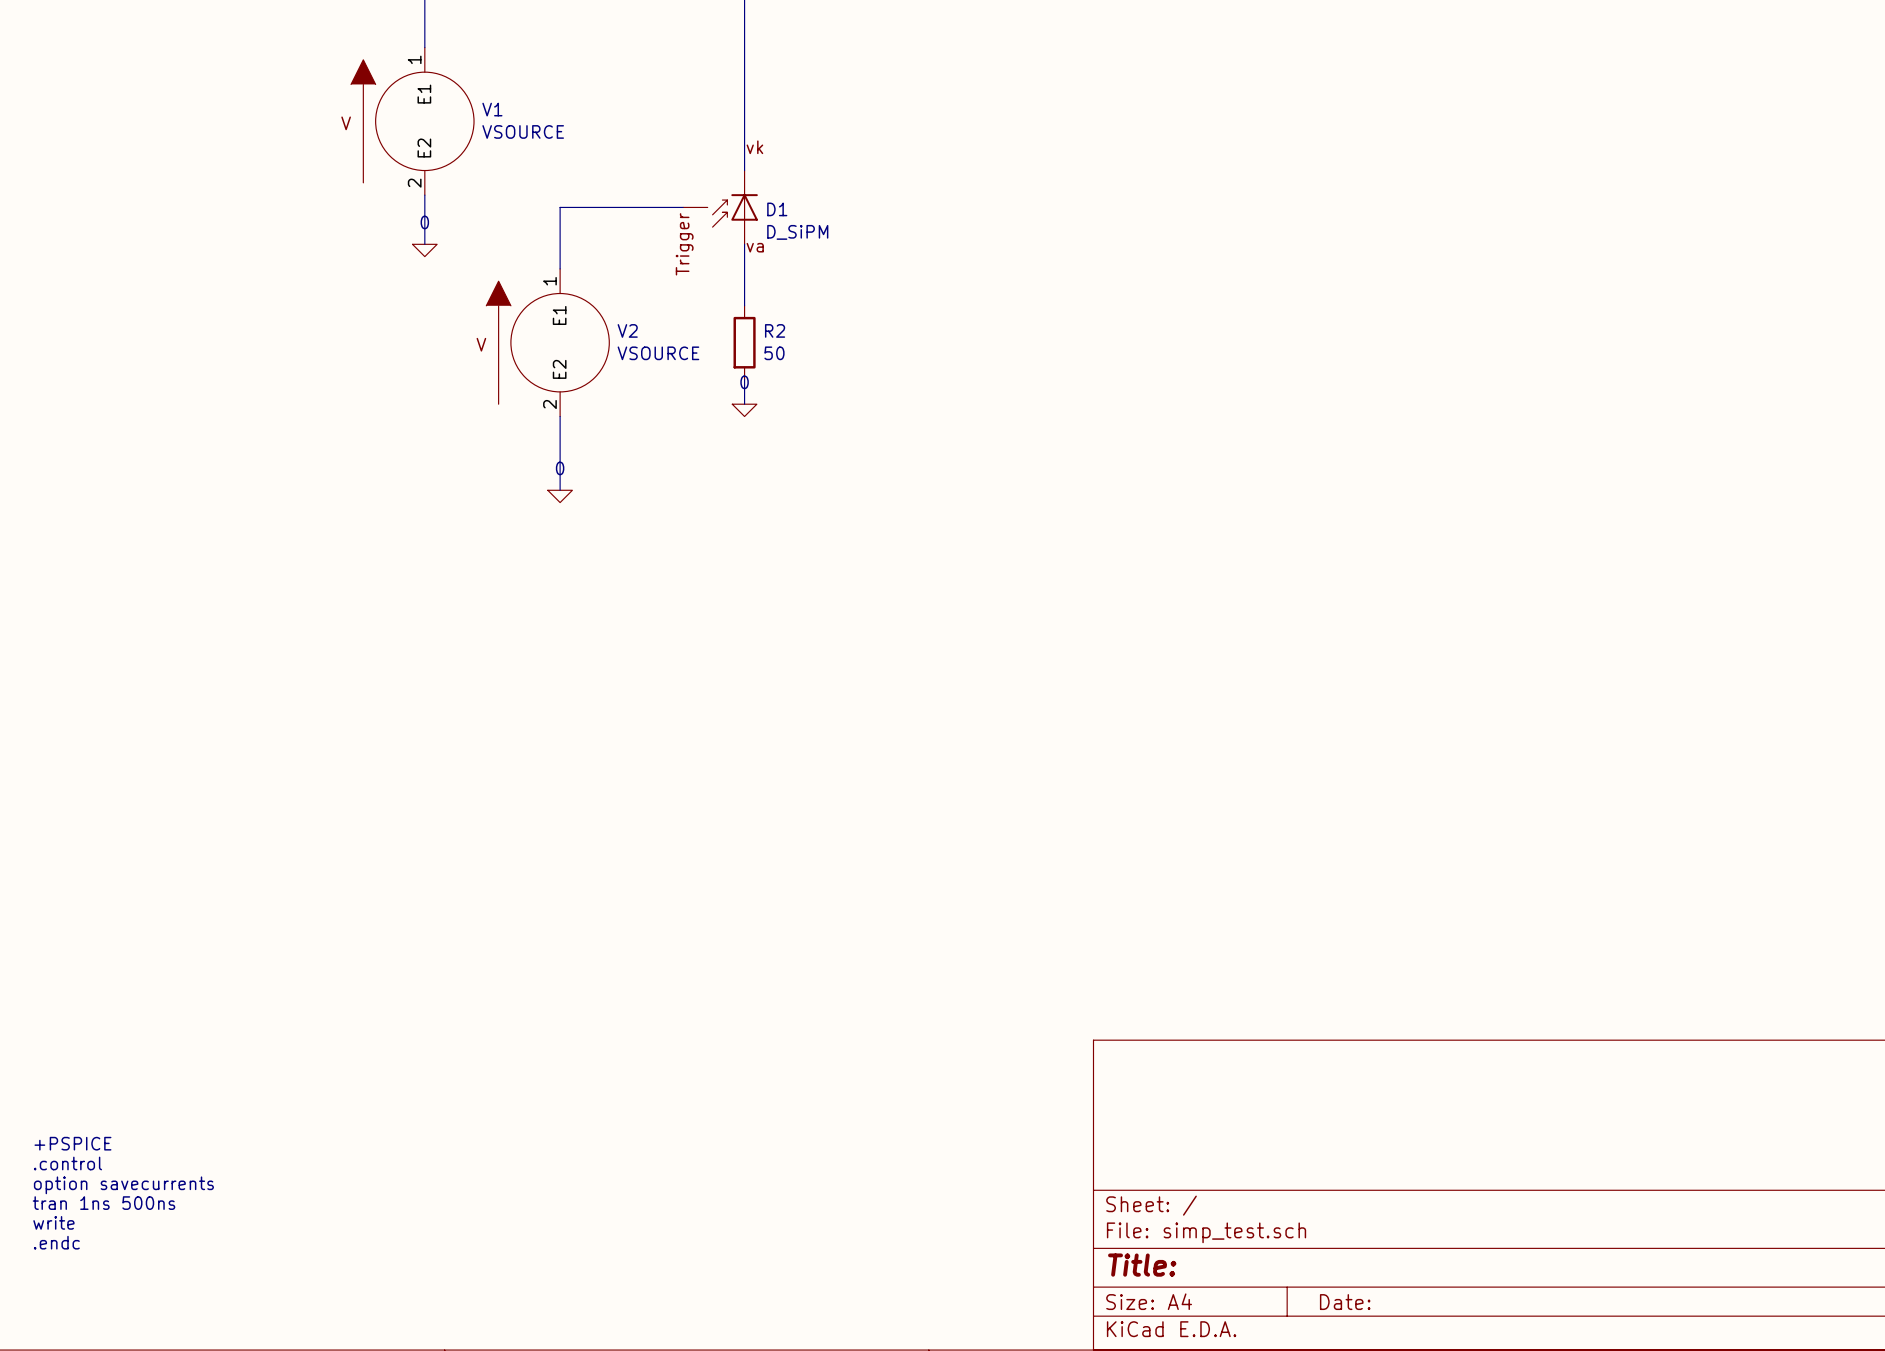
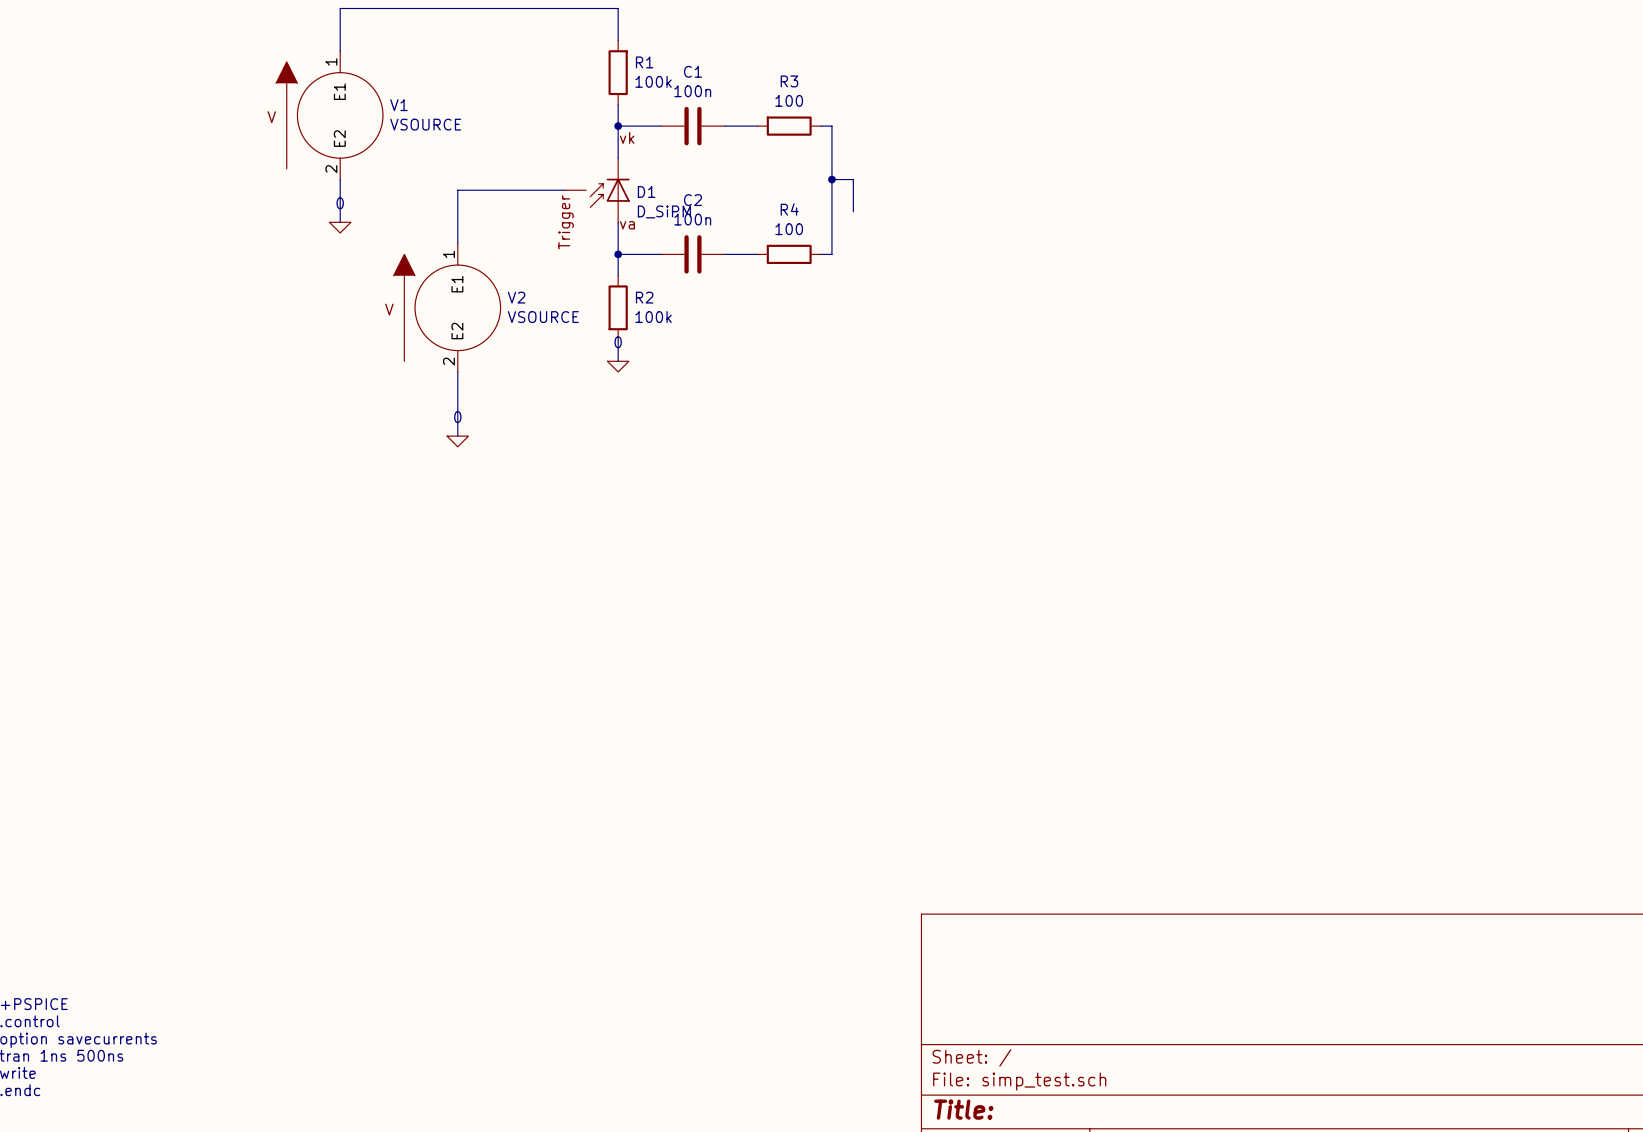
wire: (744, 35) (744, 109) -> none
R1: none -> 100k (618, 72)
wire: none -> (618, 126) (660, 126)
junction: none -> (618, 126)
C1: none -> 100n (692, 126)
wire: none -> (725, 126) (757, 126)
R3: none -> 100 (789, 126)
wire: none -> (821, 126) (831, 126) (831, 254) (821, 254)
wire: none -> (831, 179) (853, 179) (853, 211)
junction: none -> (831, 179)
wire: none -> (618, 254) (660, 254)
junction: none -> (618, 254)
C2: none -> 100n (692, 254)
wire: none -> (725, 254) (757, 254)
R4: none -> 100 (789, 254)
R2 value: 50 (774, 353) -> 100k (653, 317)

